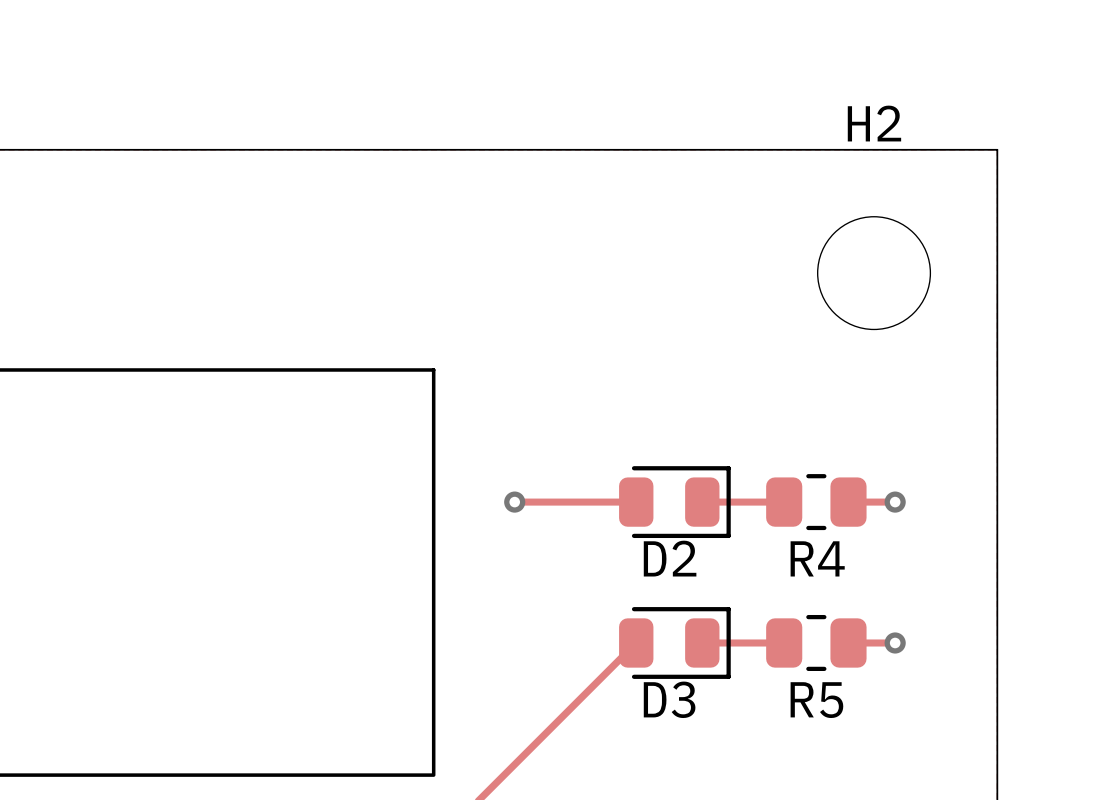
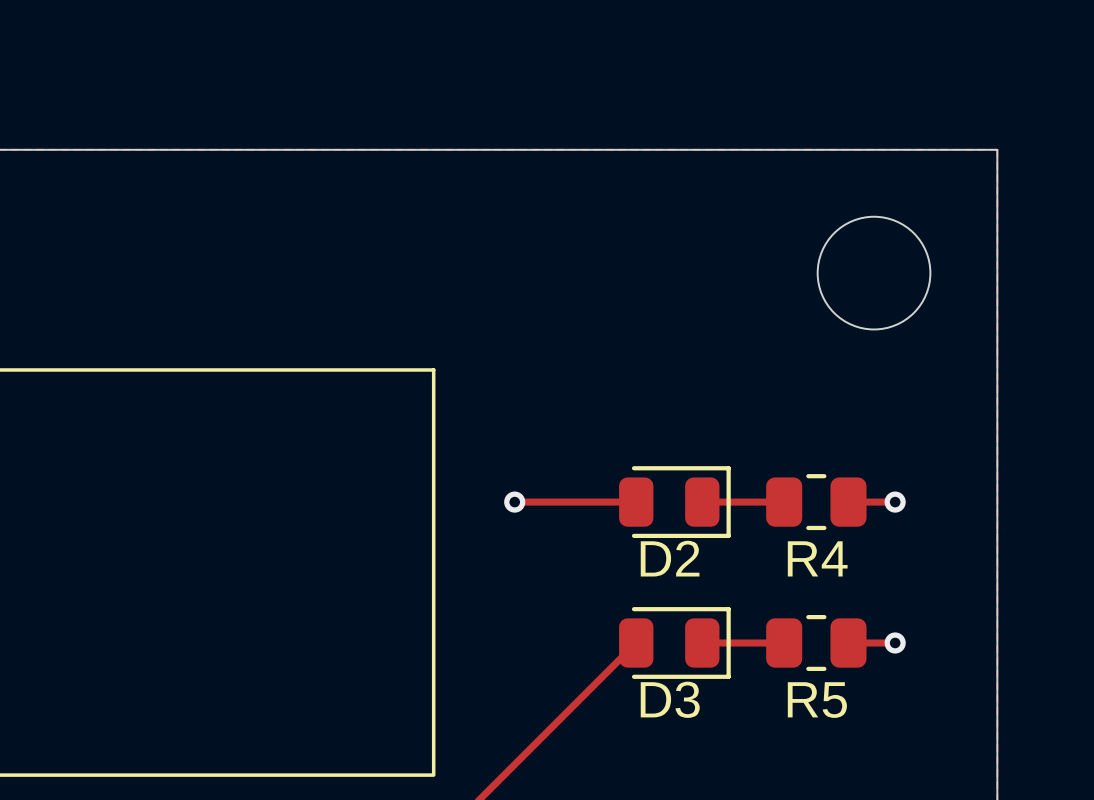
H2 name: H2 (874, 123) -> none

